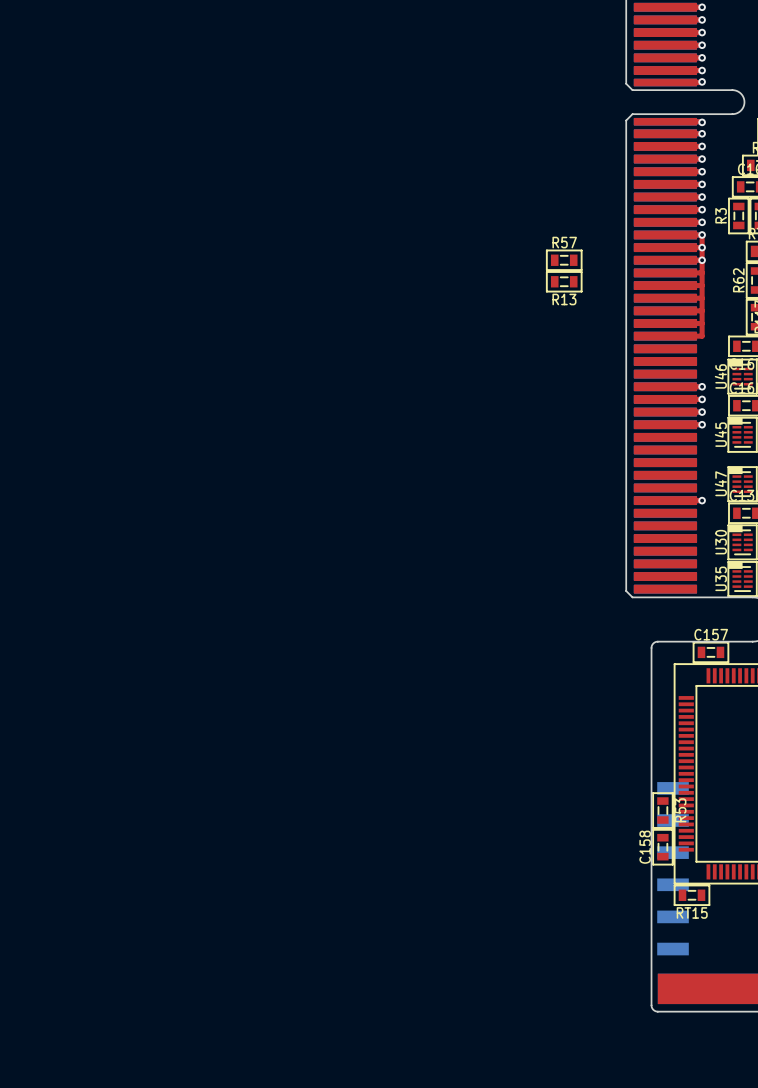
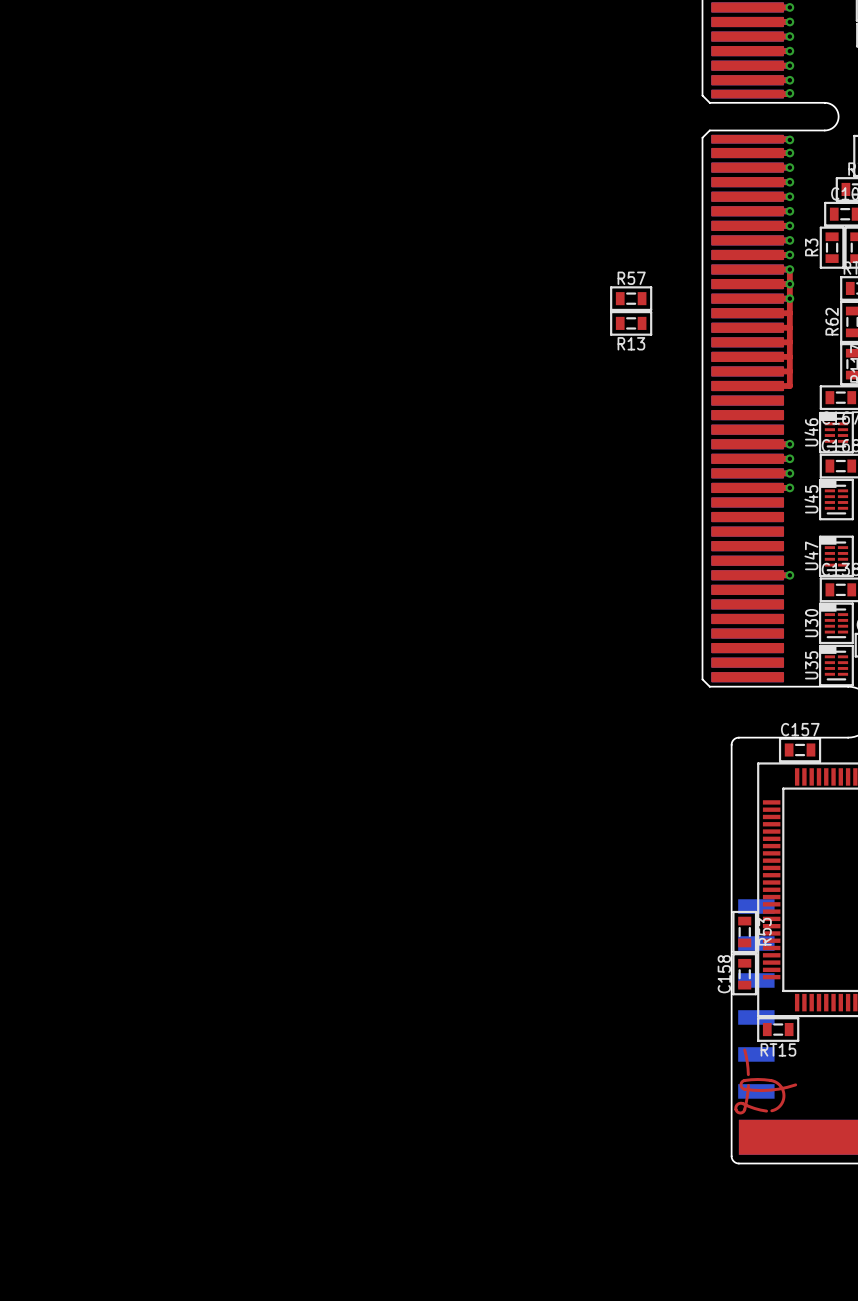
drawing: none -> [734, 1048, 798, 1115]

